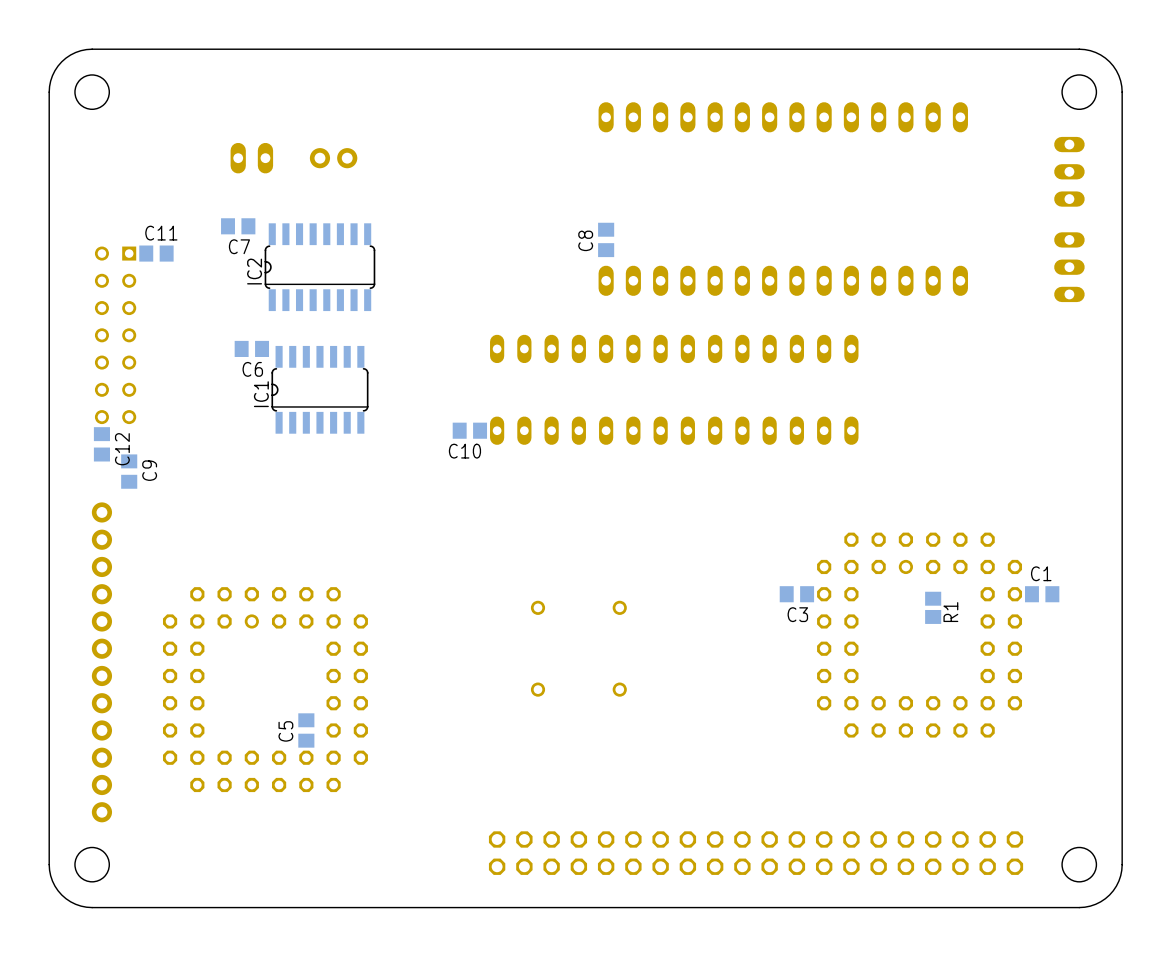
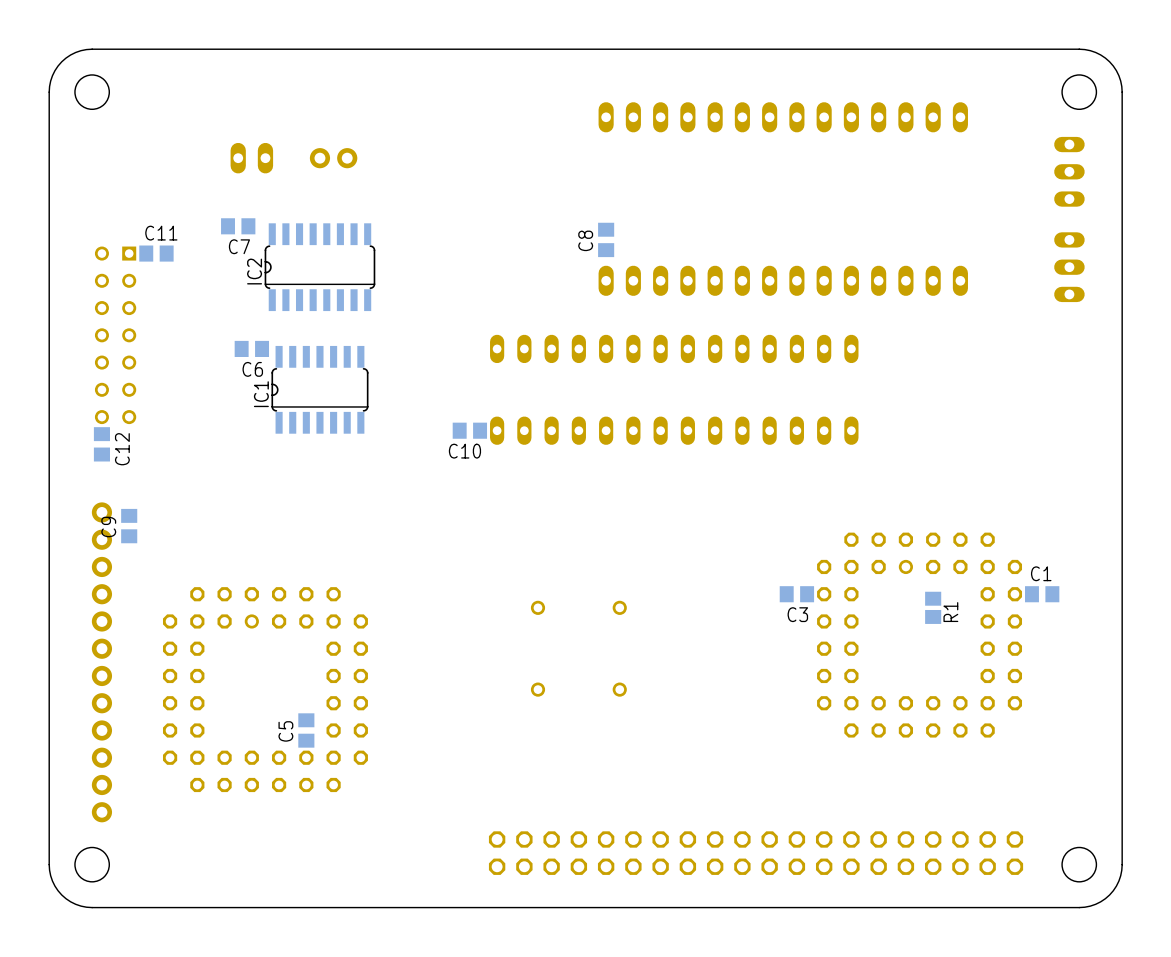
C9 name position: C9 (149, 470) -> C9 (108, 527)
C9 position: (129, 471) -> (129, 526)

